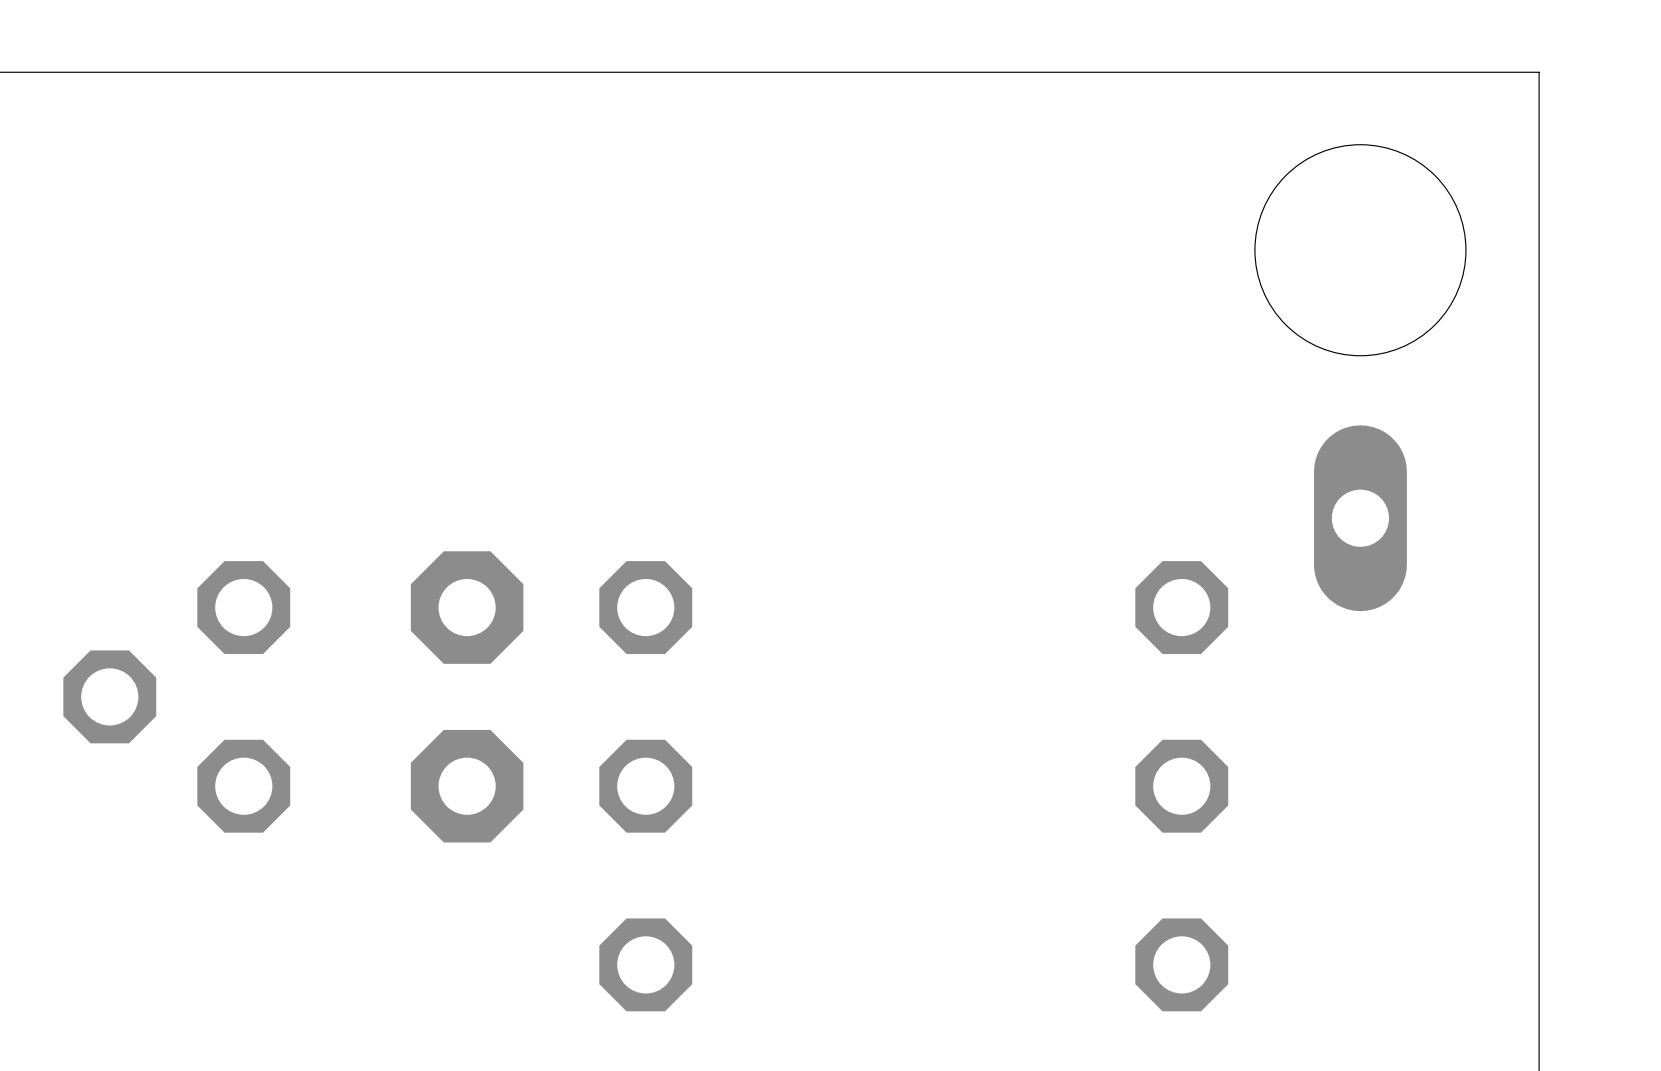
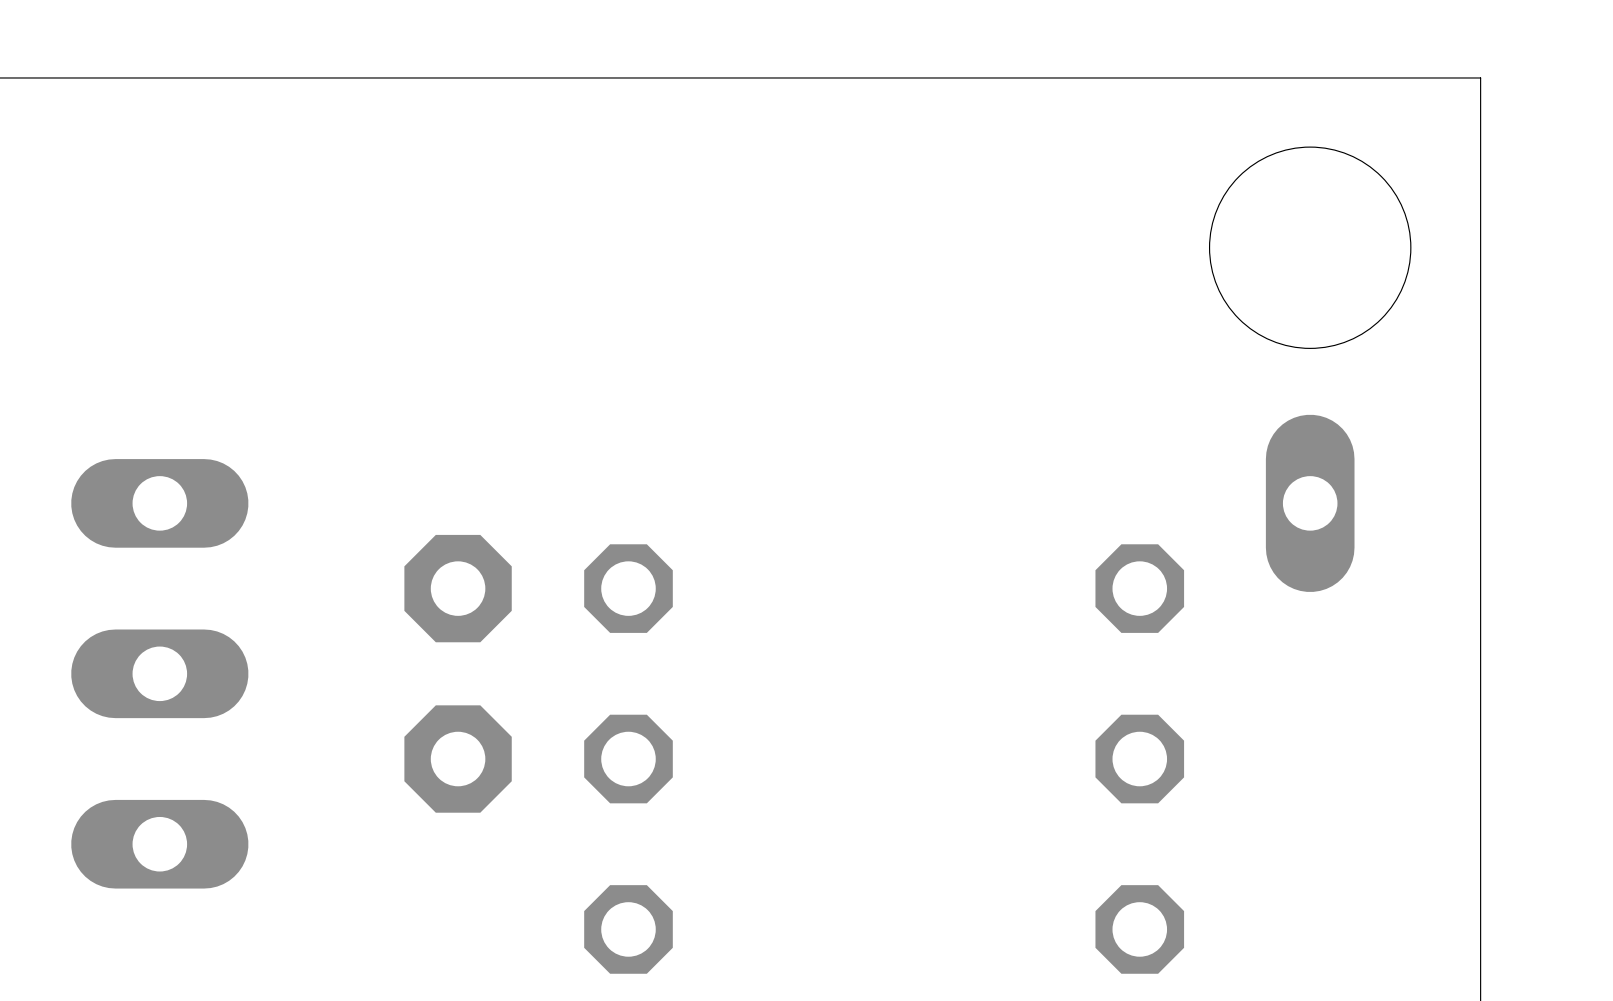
part footprint: [63, 561, 291, 833] -> [71, 459, 249, 889]

